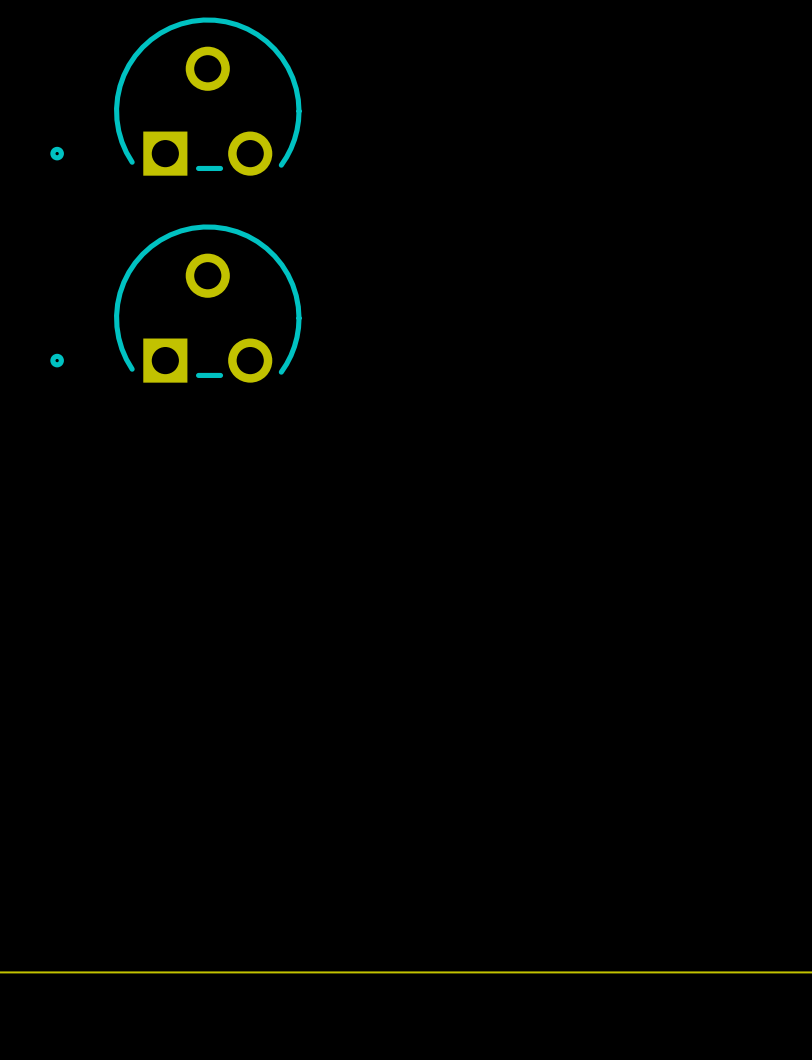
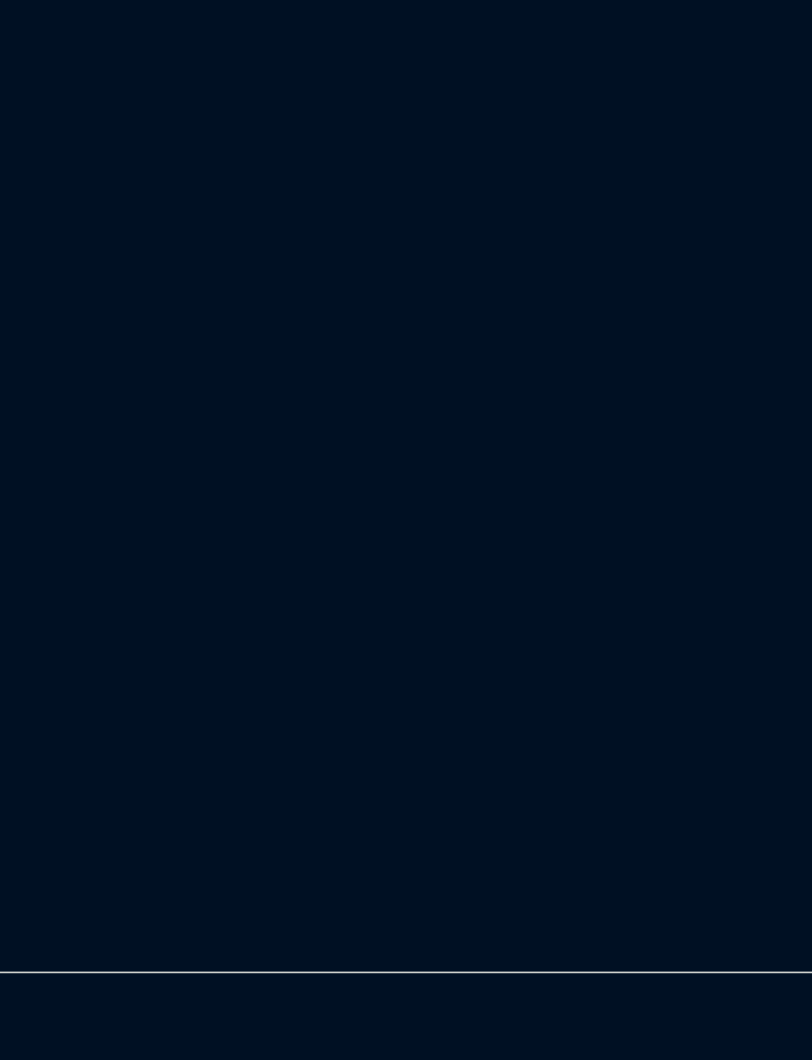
part: (175, 96) -> none
part: (175, 303) -> none

